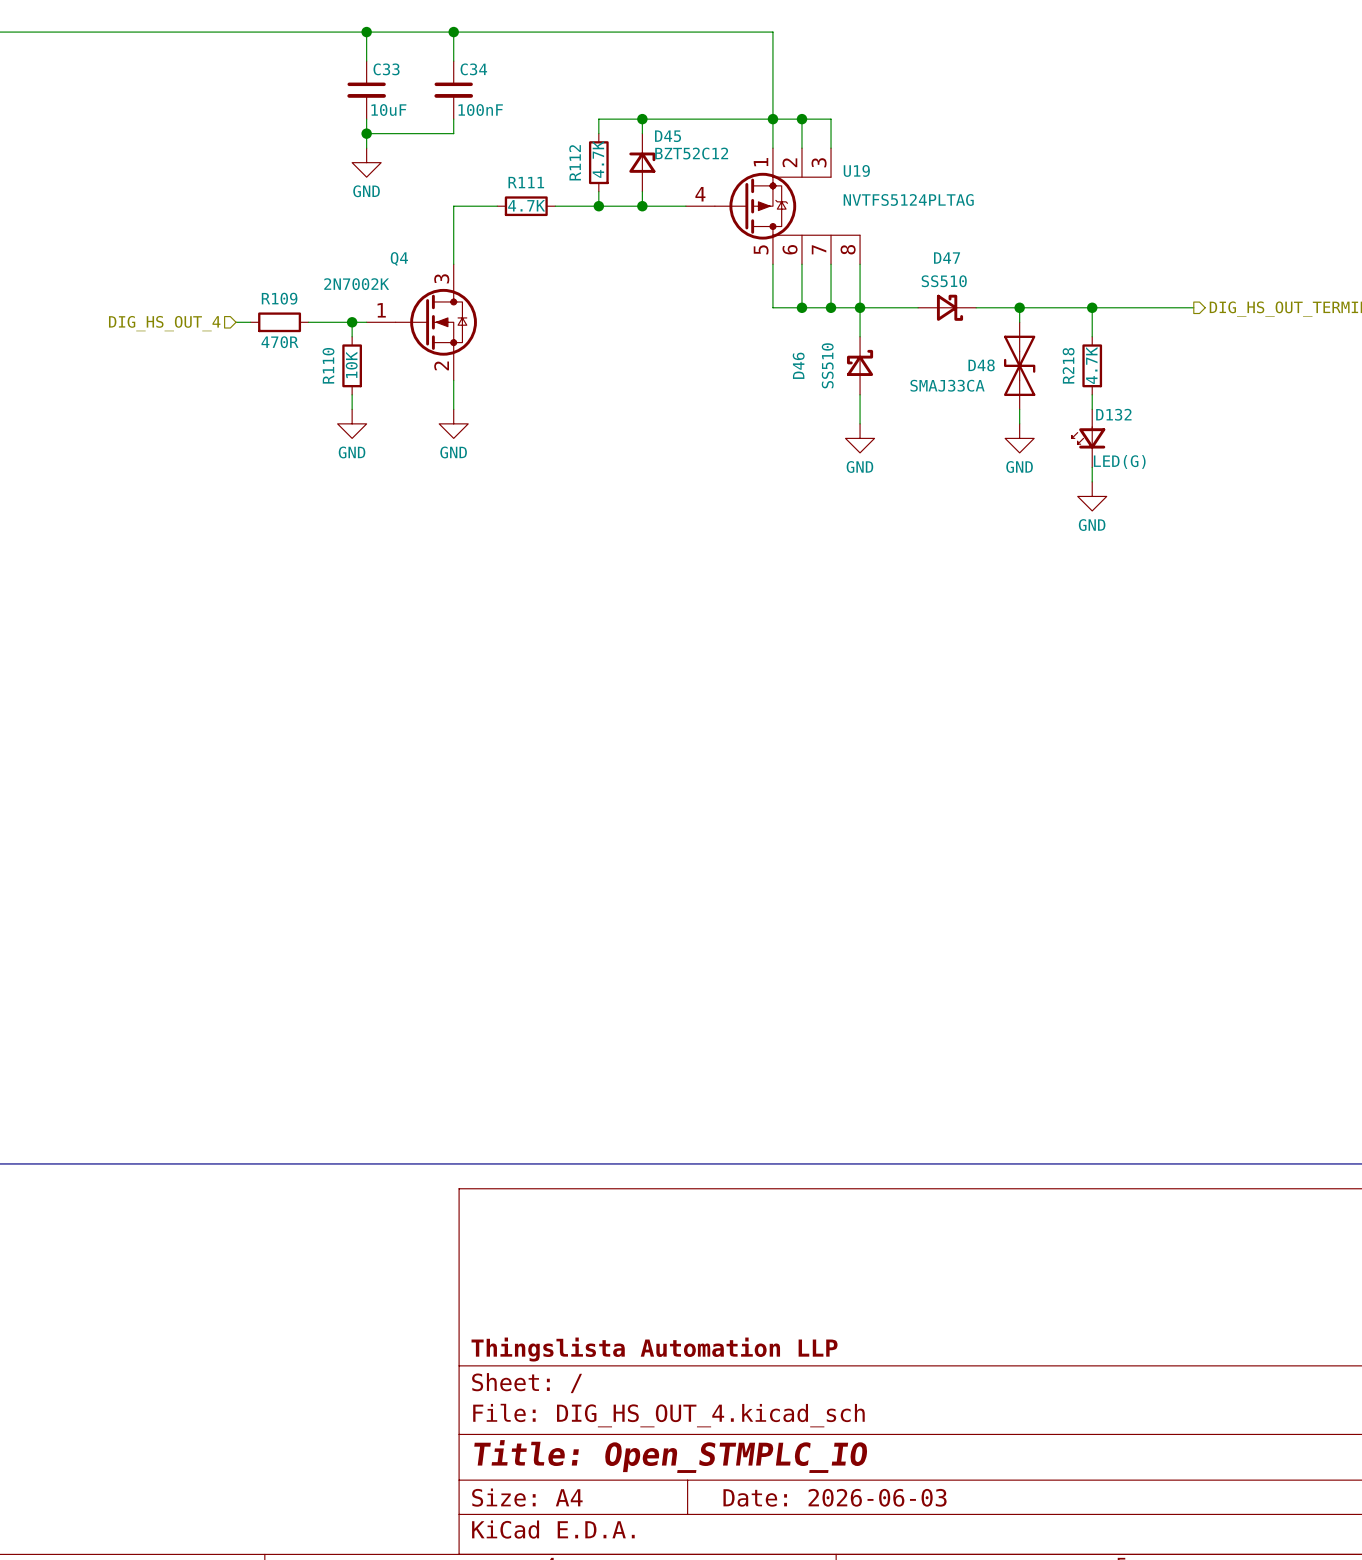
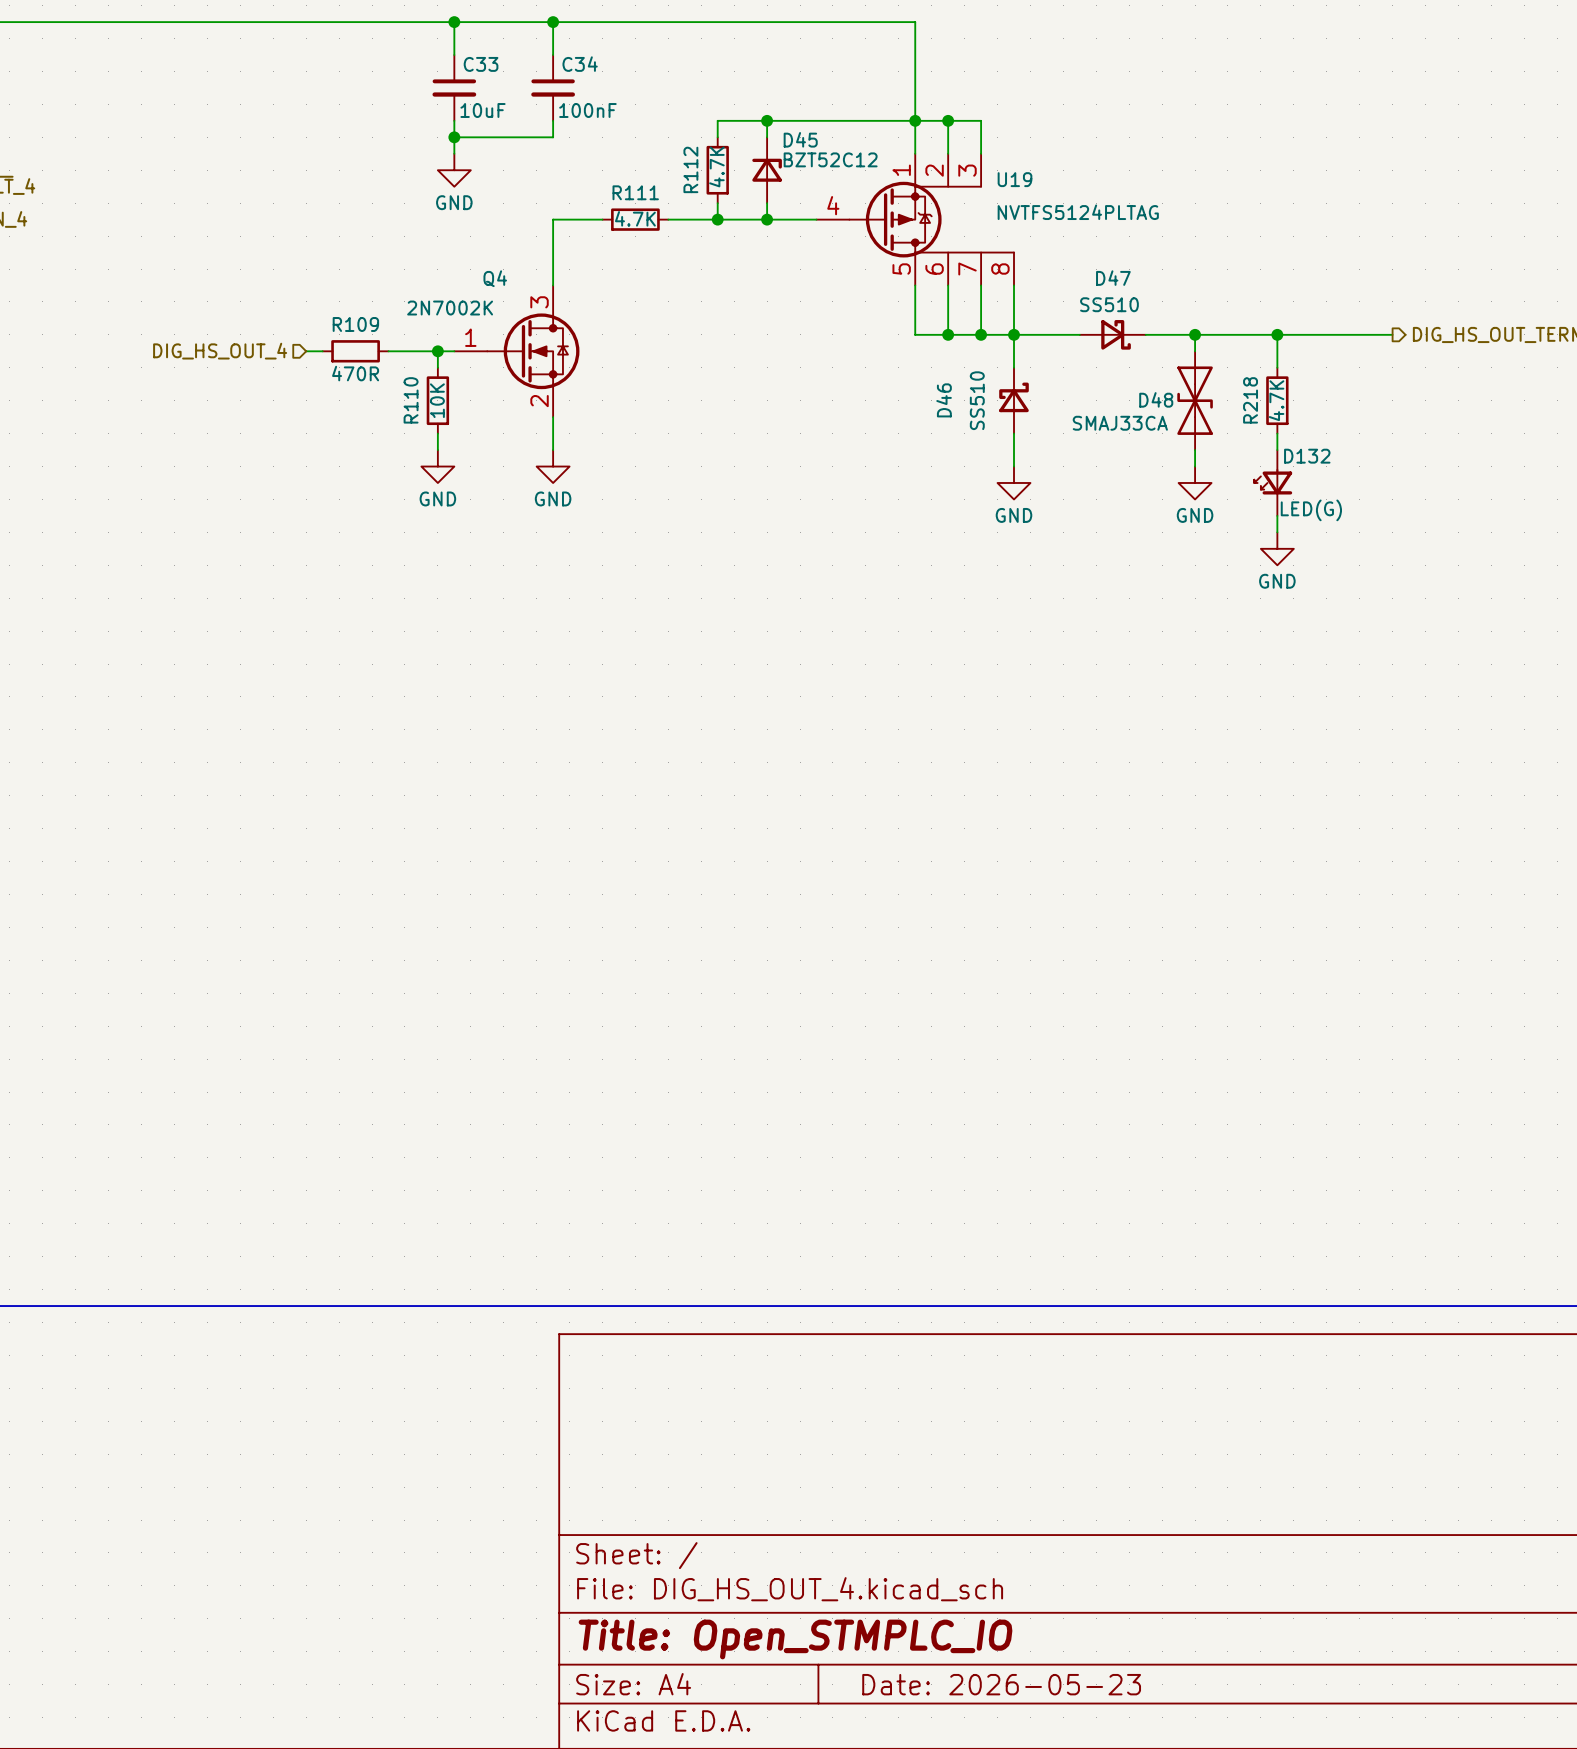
title block: Thingslista Automation LLP (654, 1349) -> none
title block: Date: 2026-06-03 (835, 1497) -> Date: 2026-05-23 (1001, 1684)

